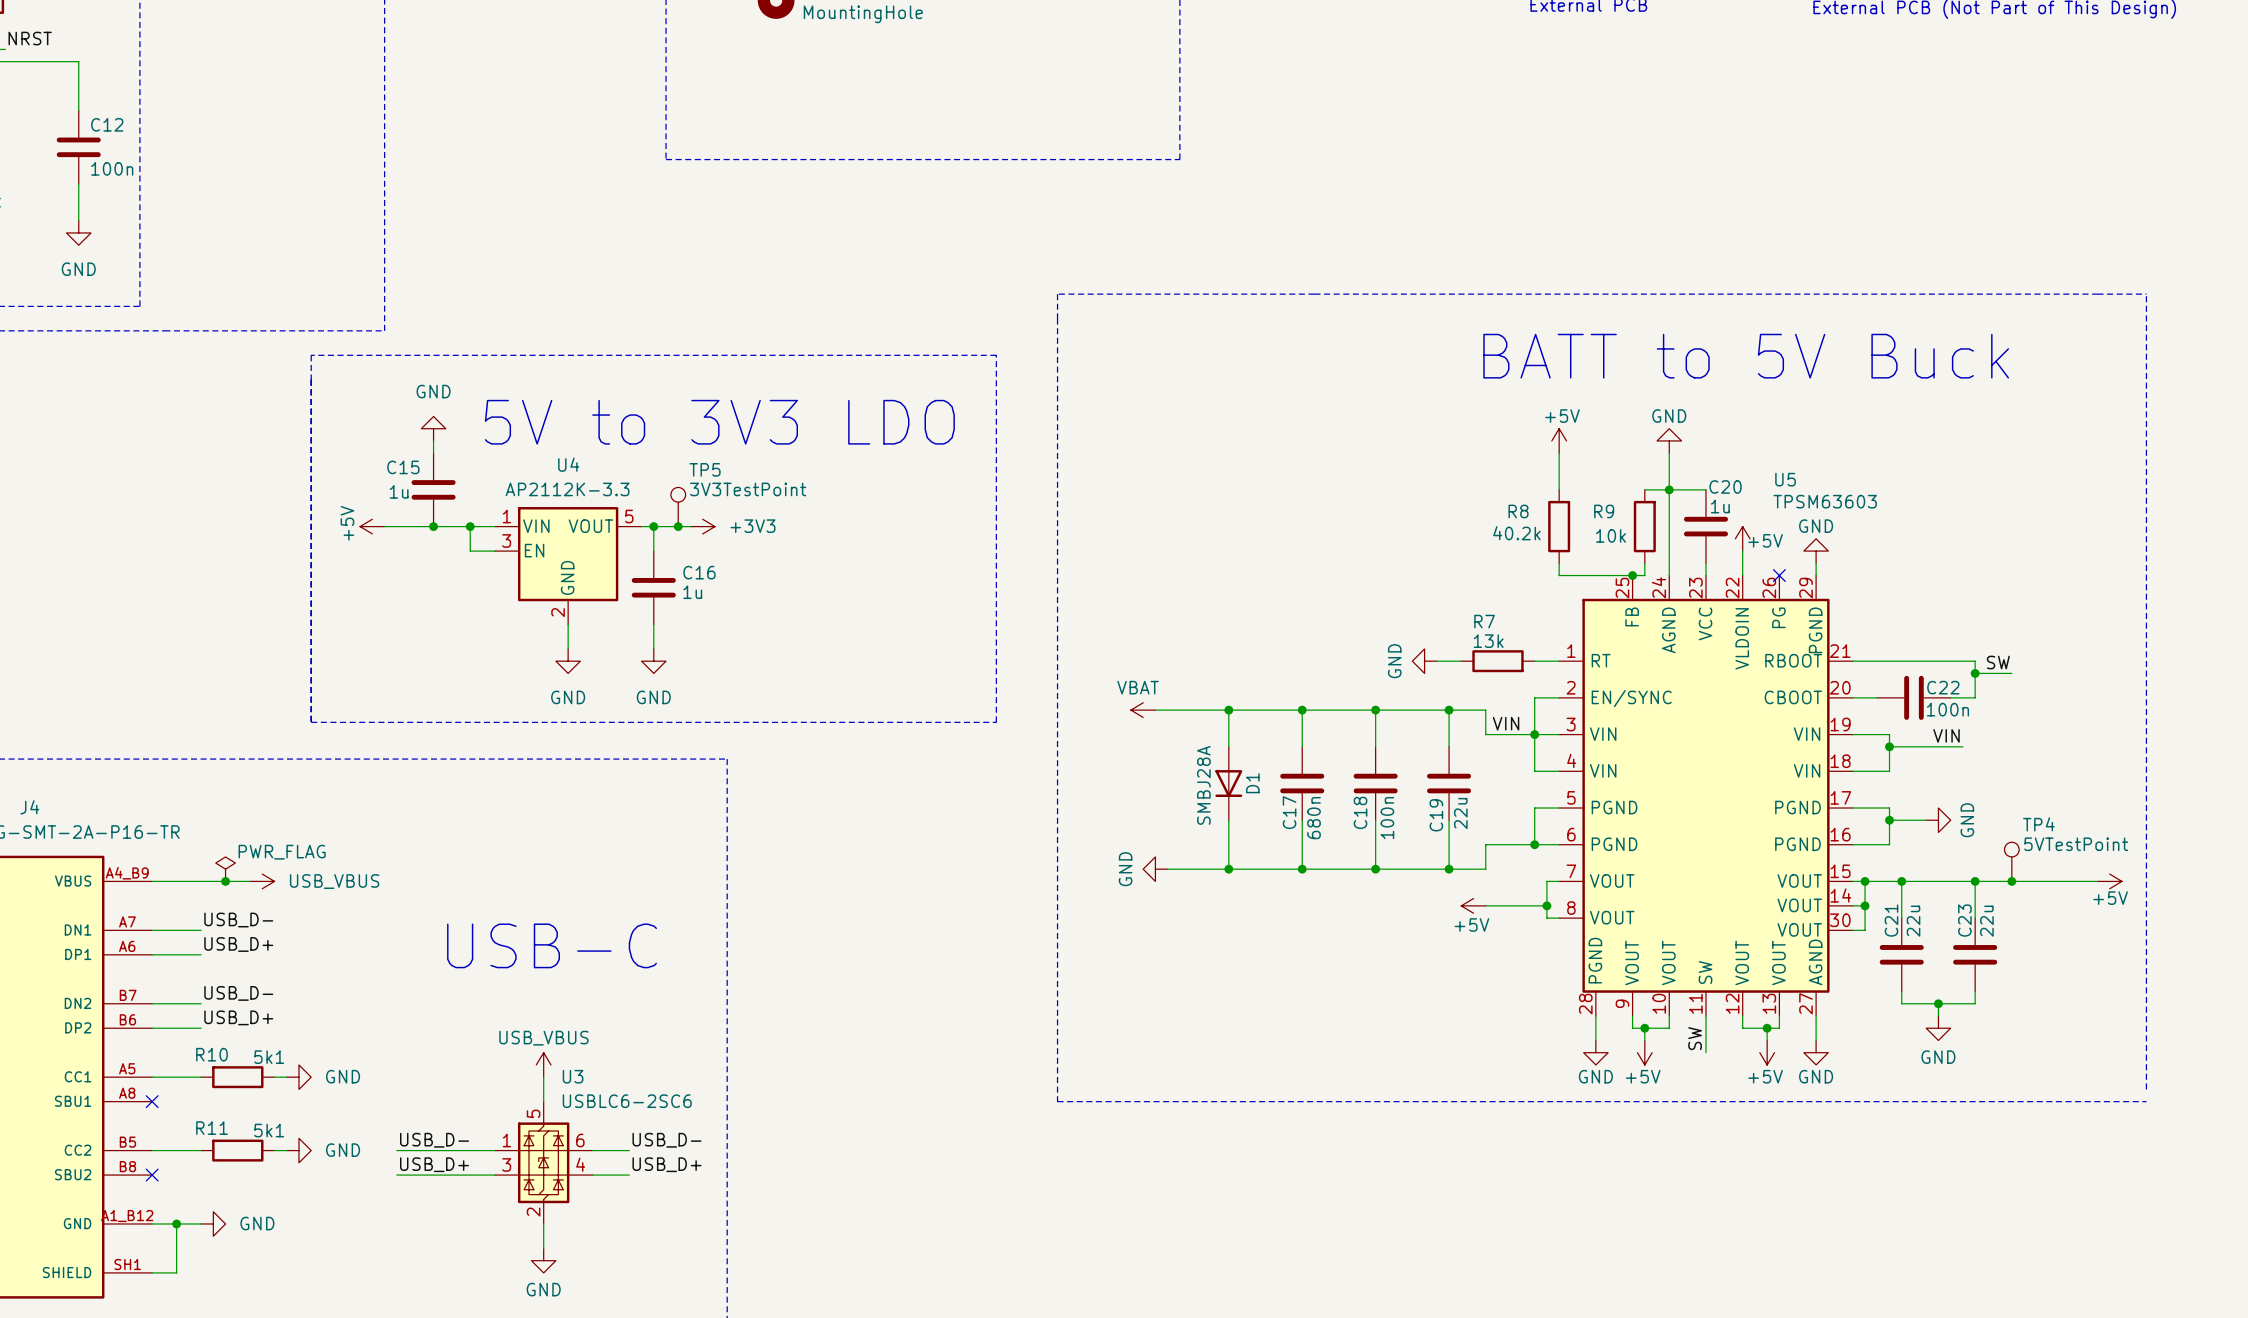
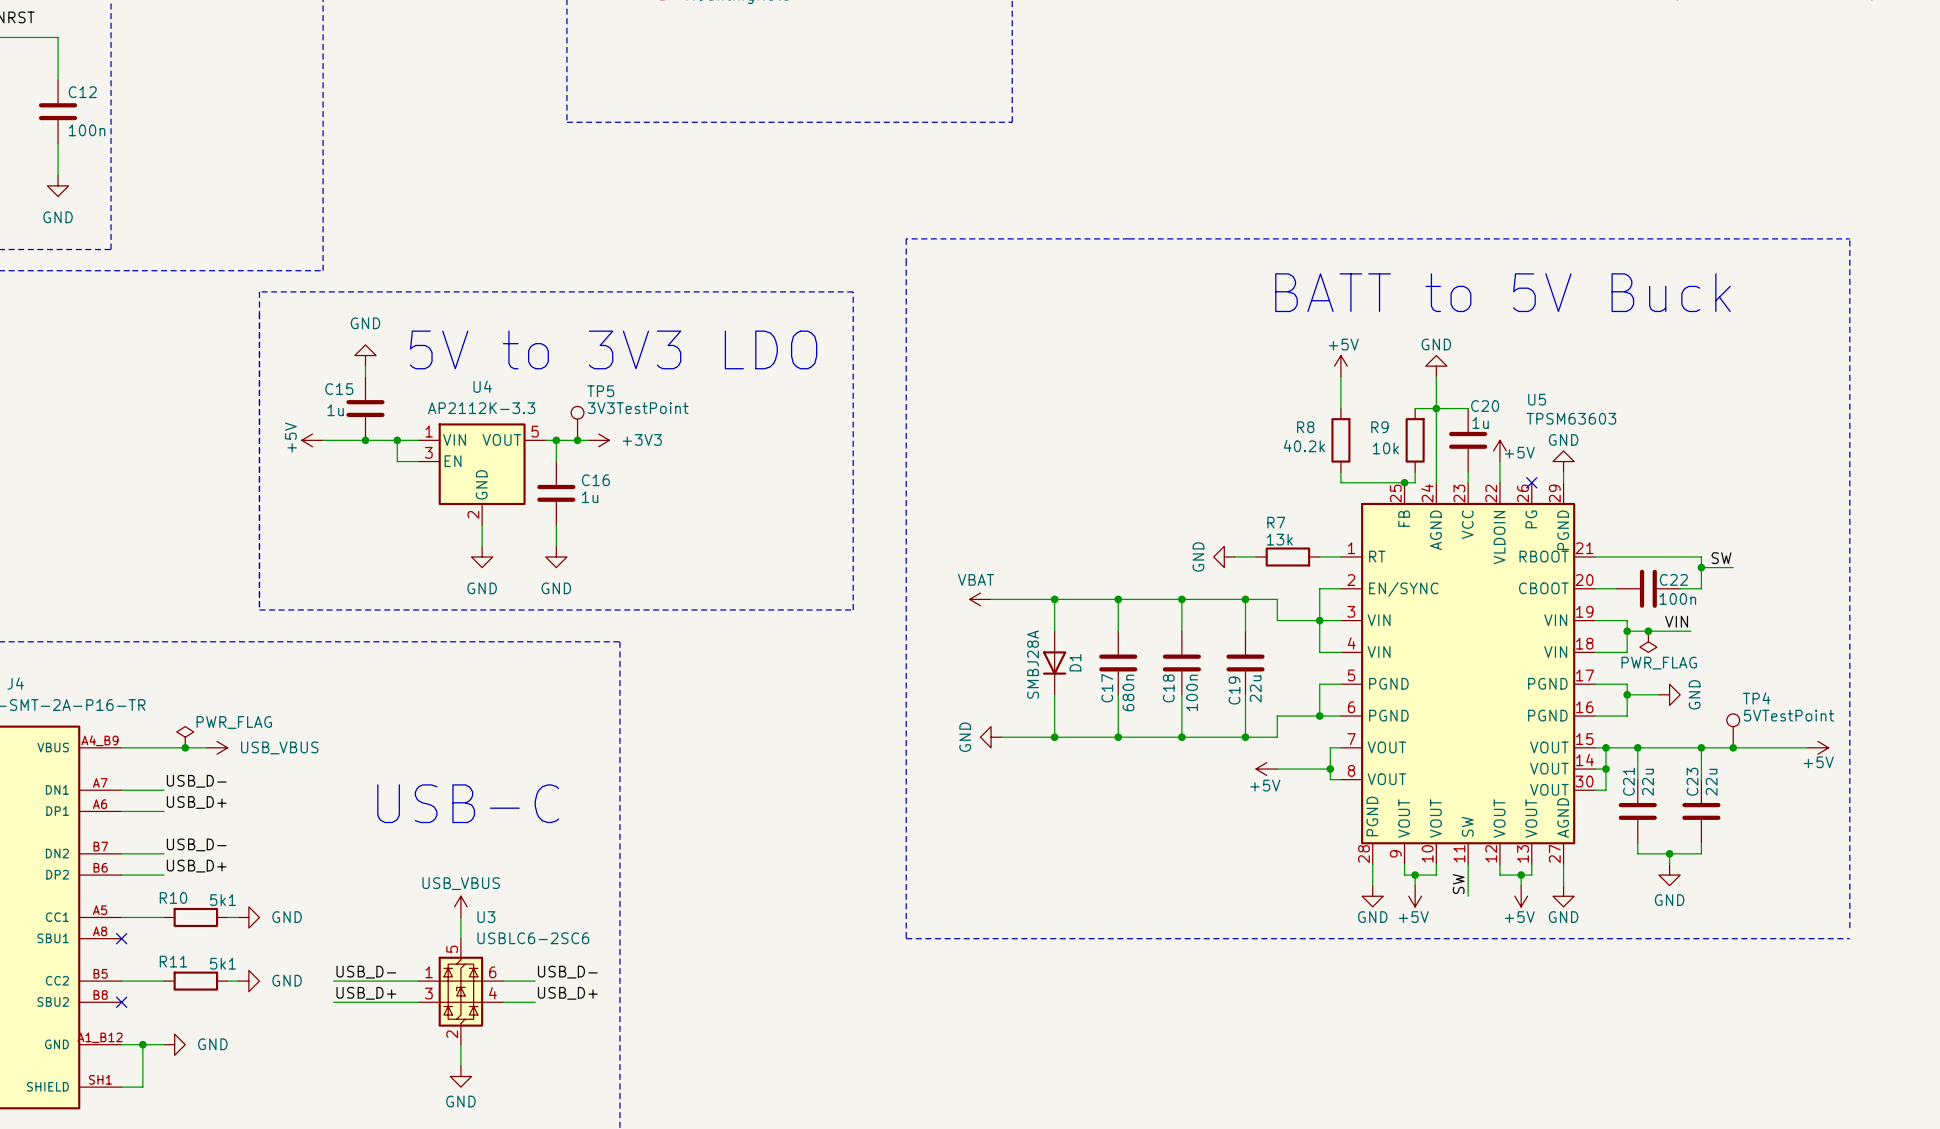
label: VIN (1506, 723) -> none
junction: none -> (1648, 631)
power symbol: none -> PWR_FLAG (1648, 641)

